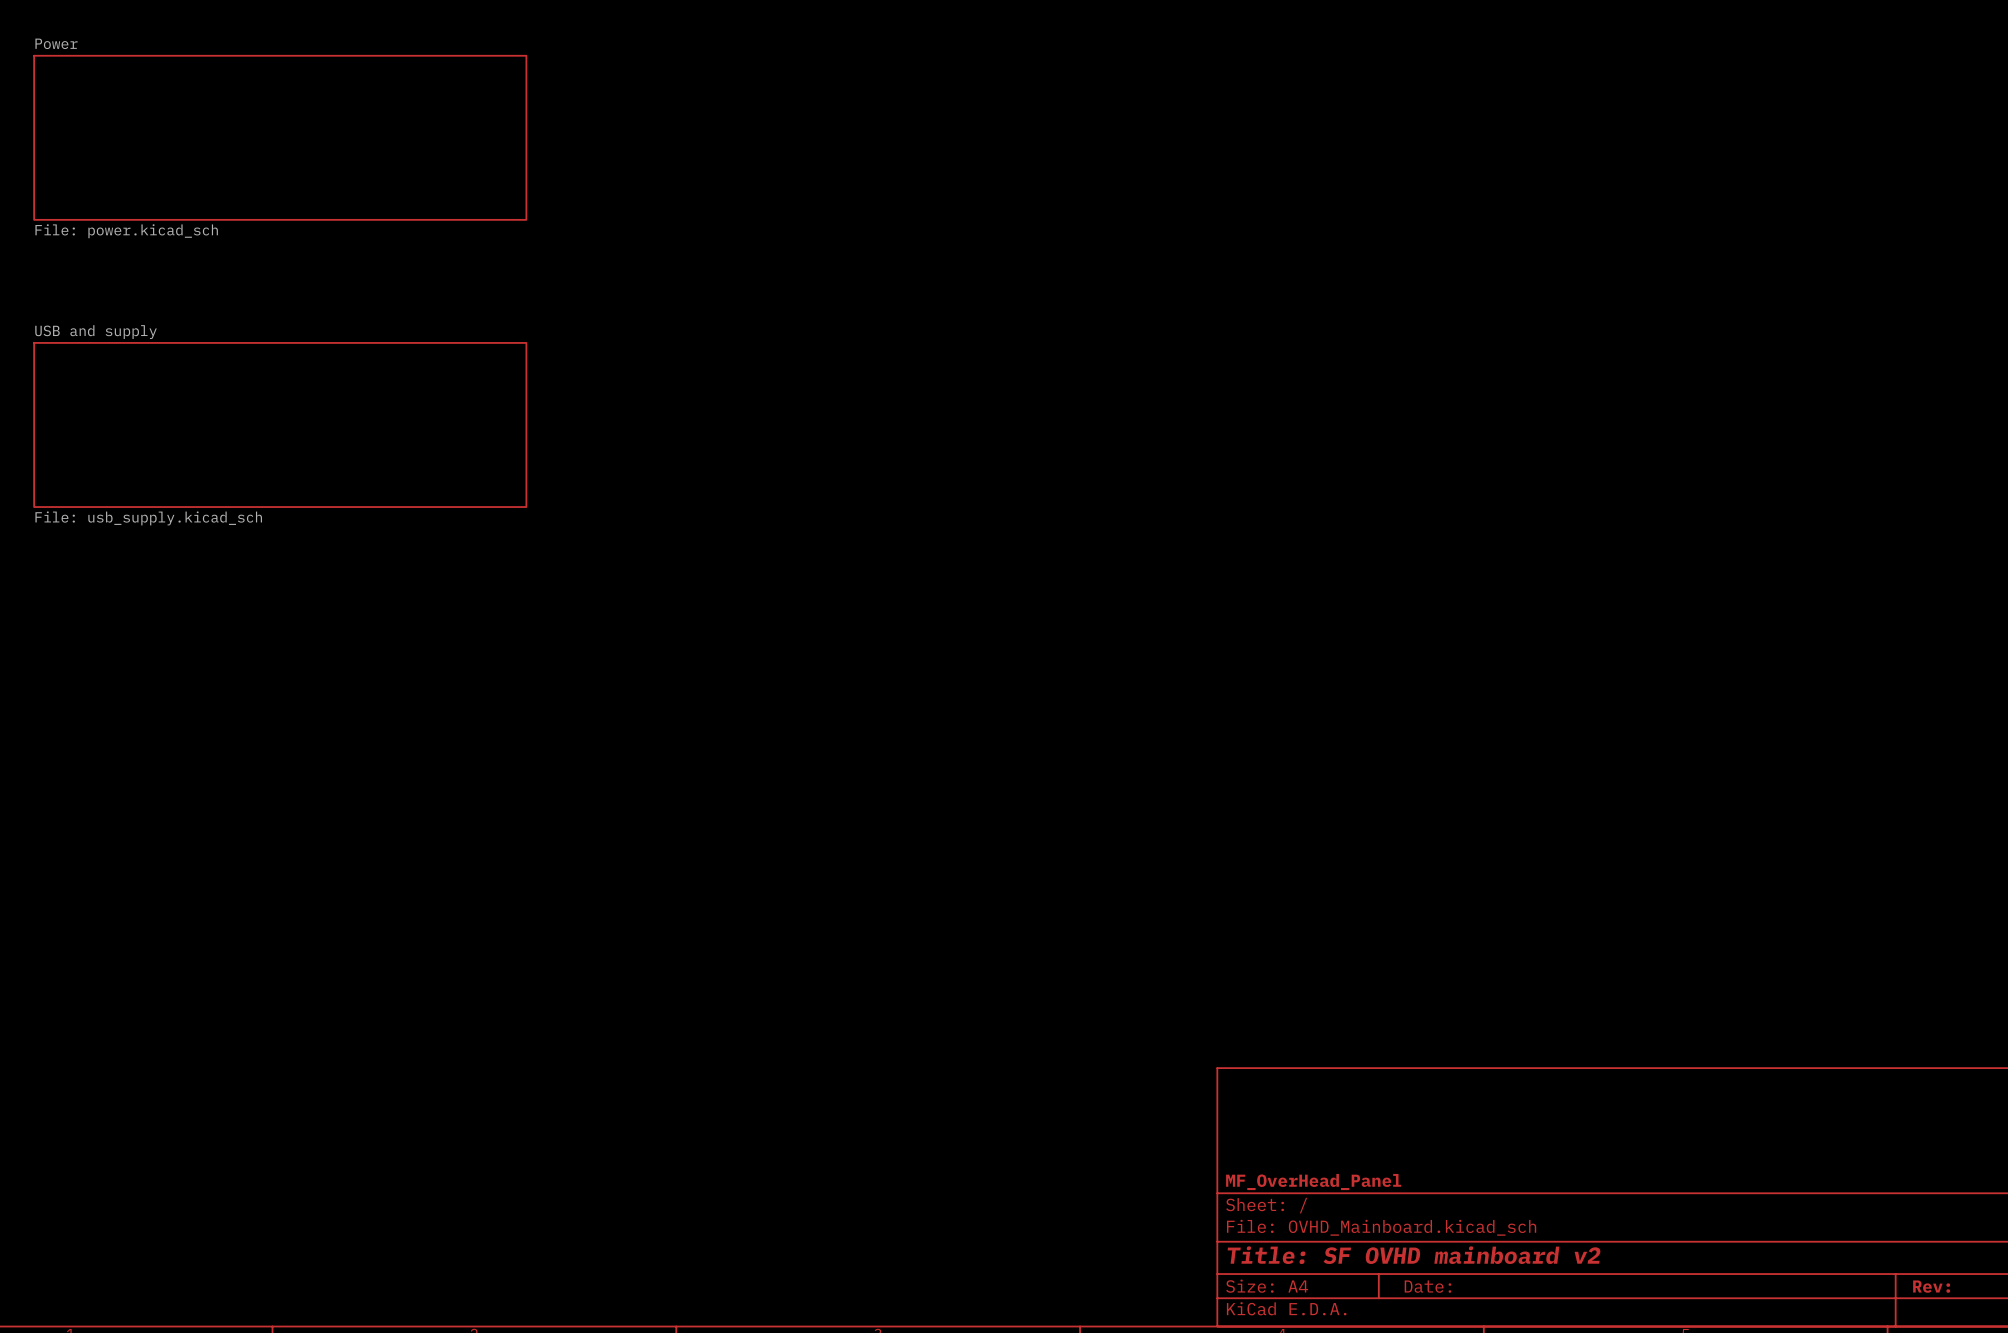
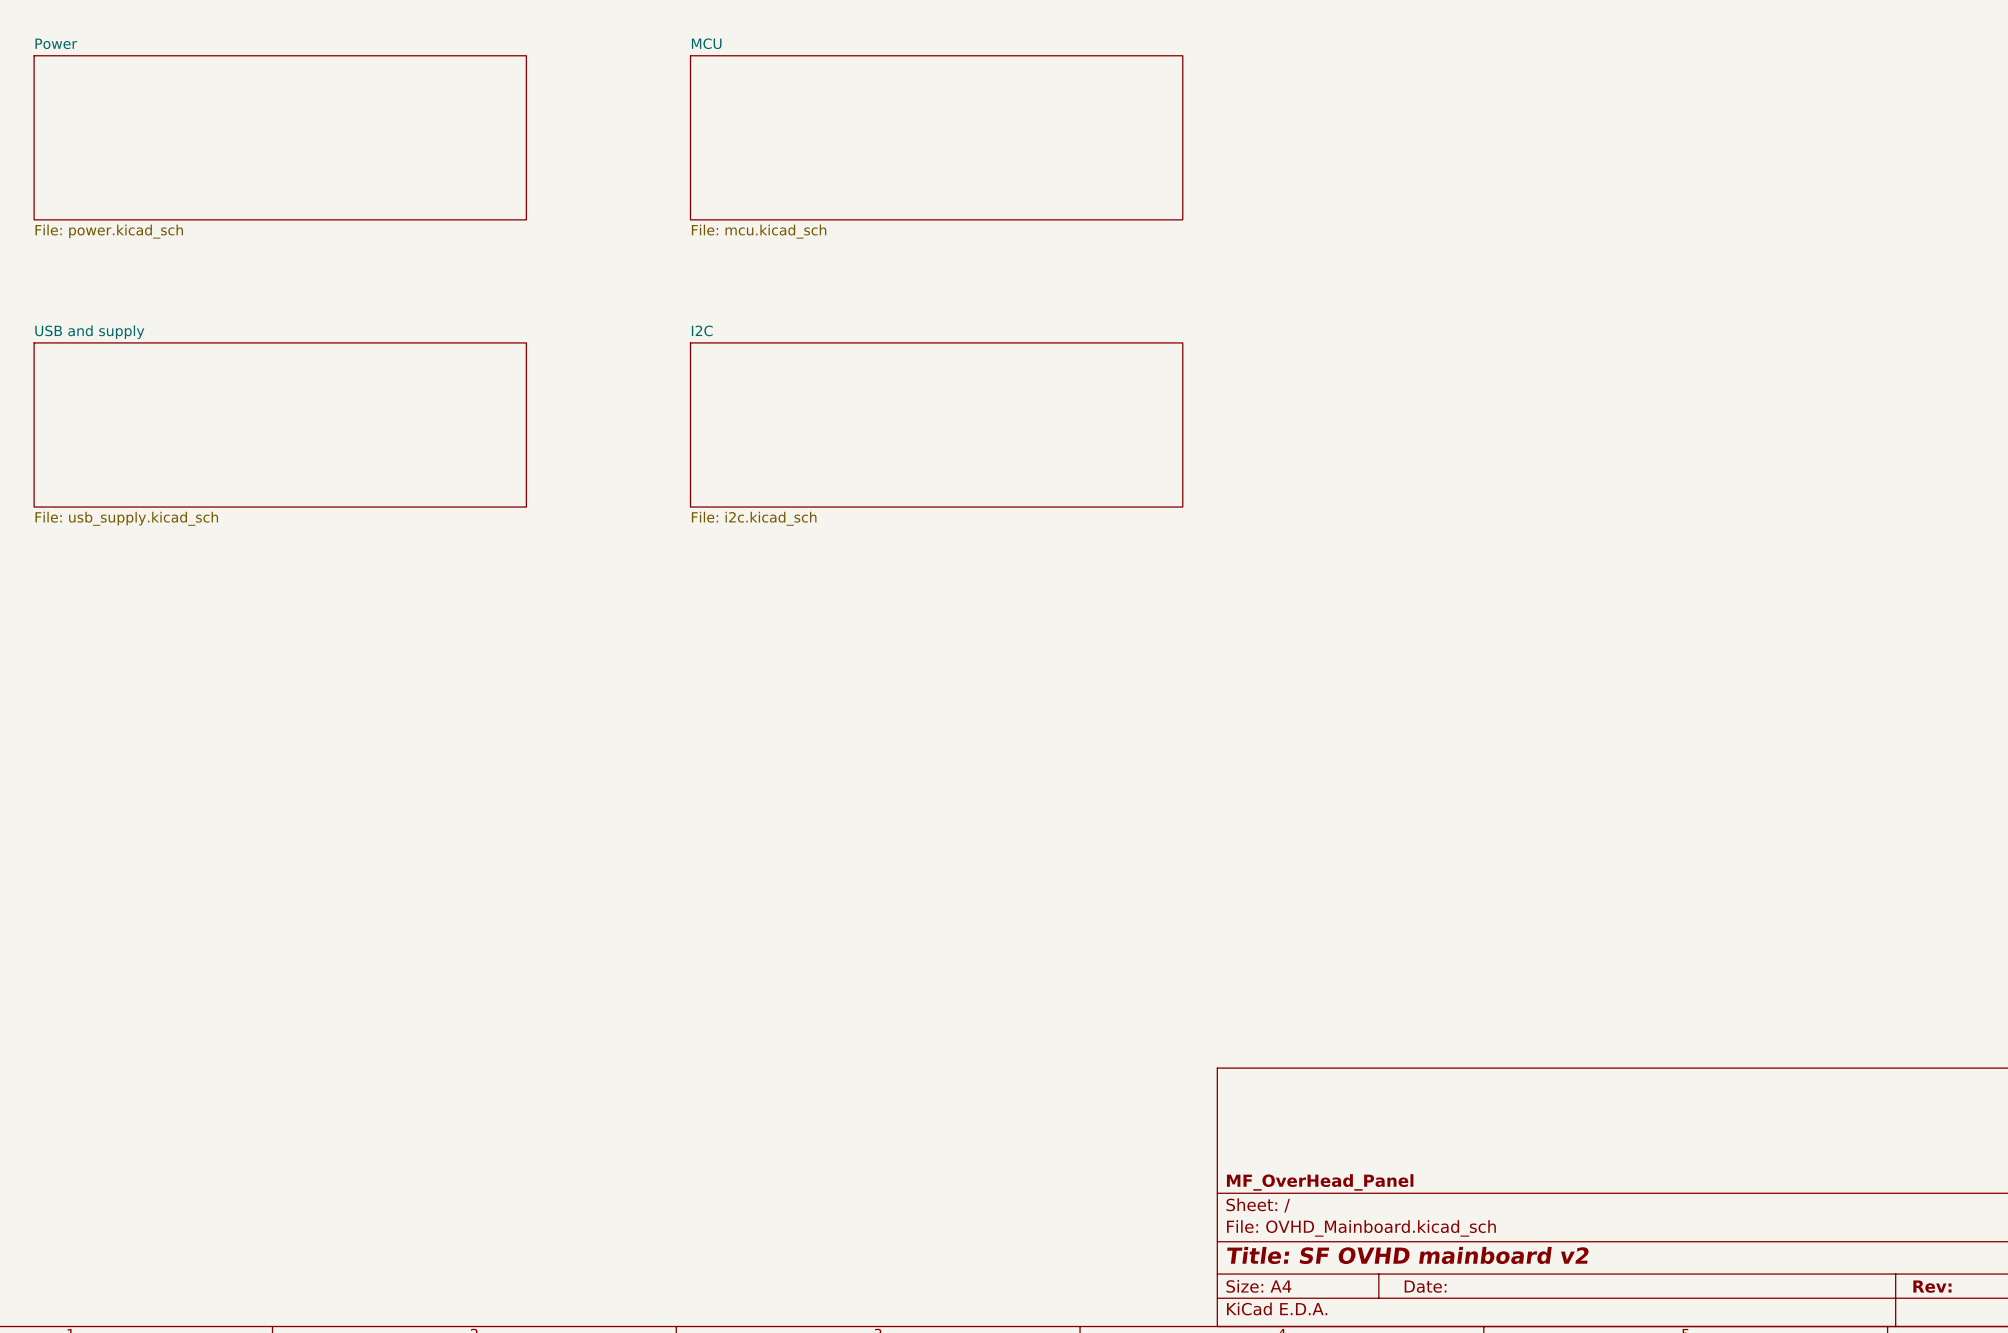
sheet MCU: none -> File: mcu.kicad_sch (936, 137)
sheet I2C: none -> File: i2c.kicad_sch (936, 424)

